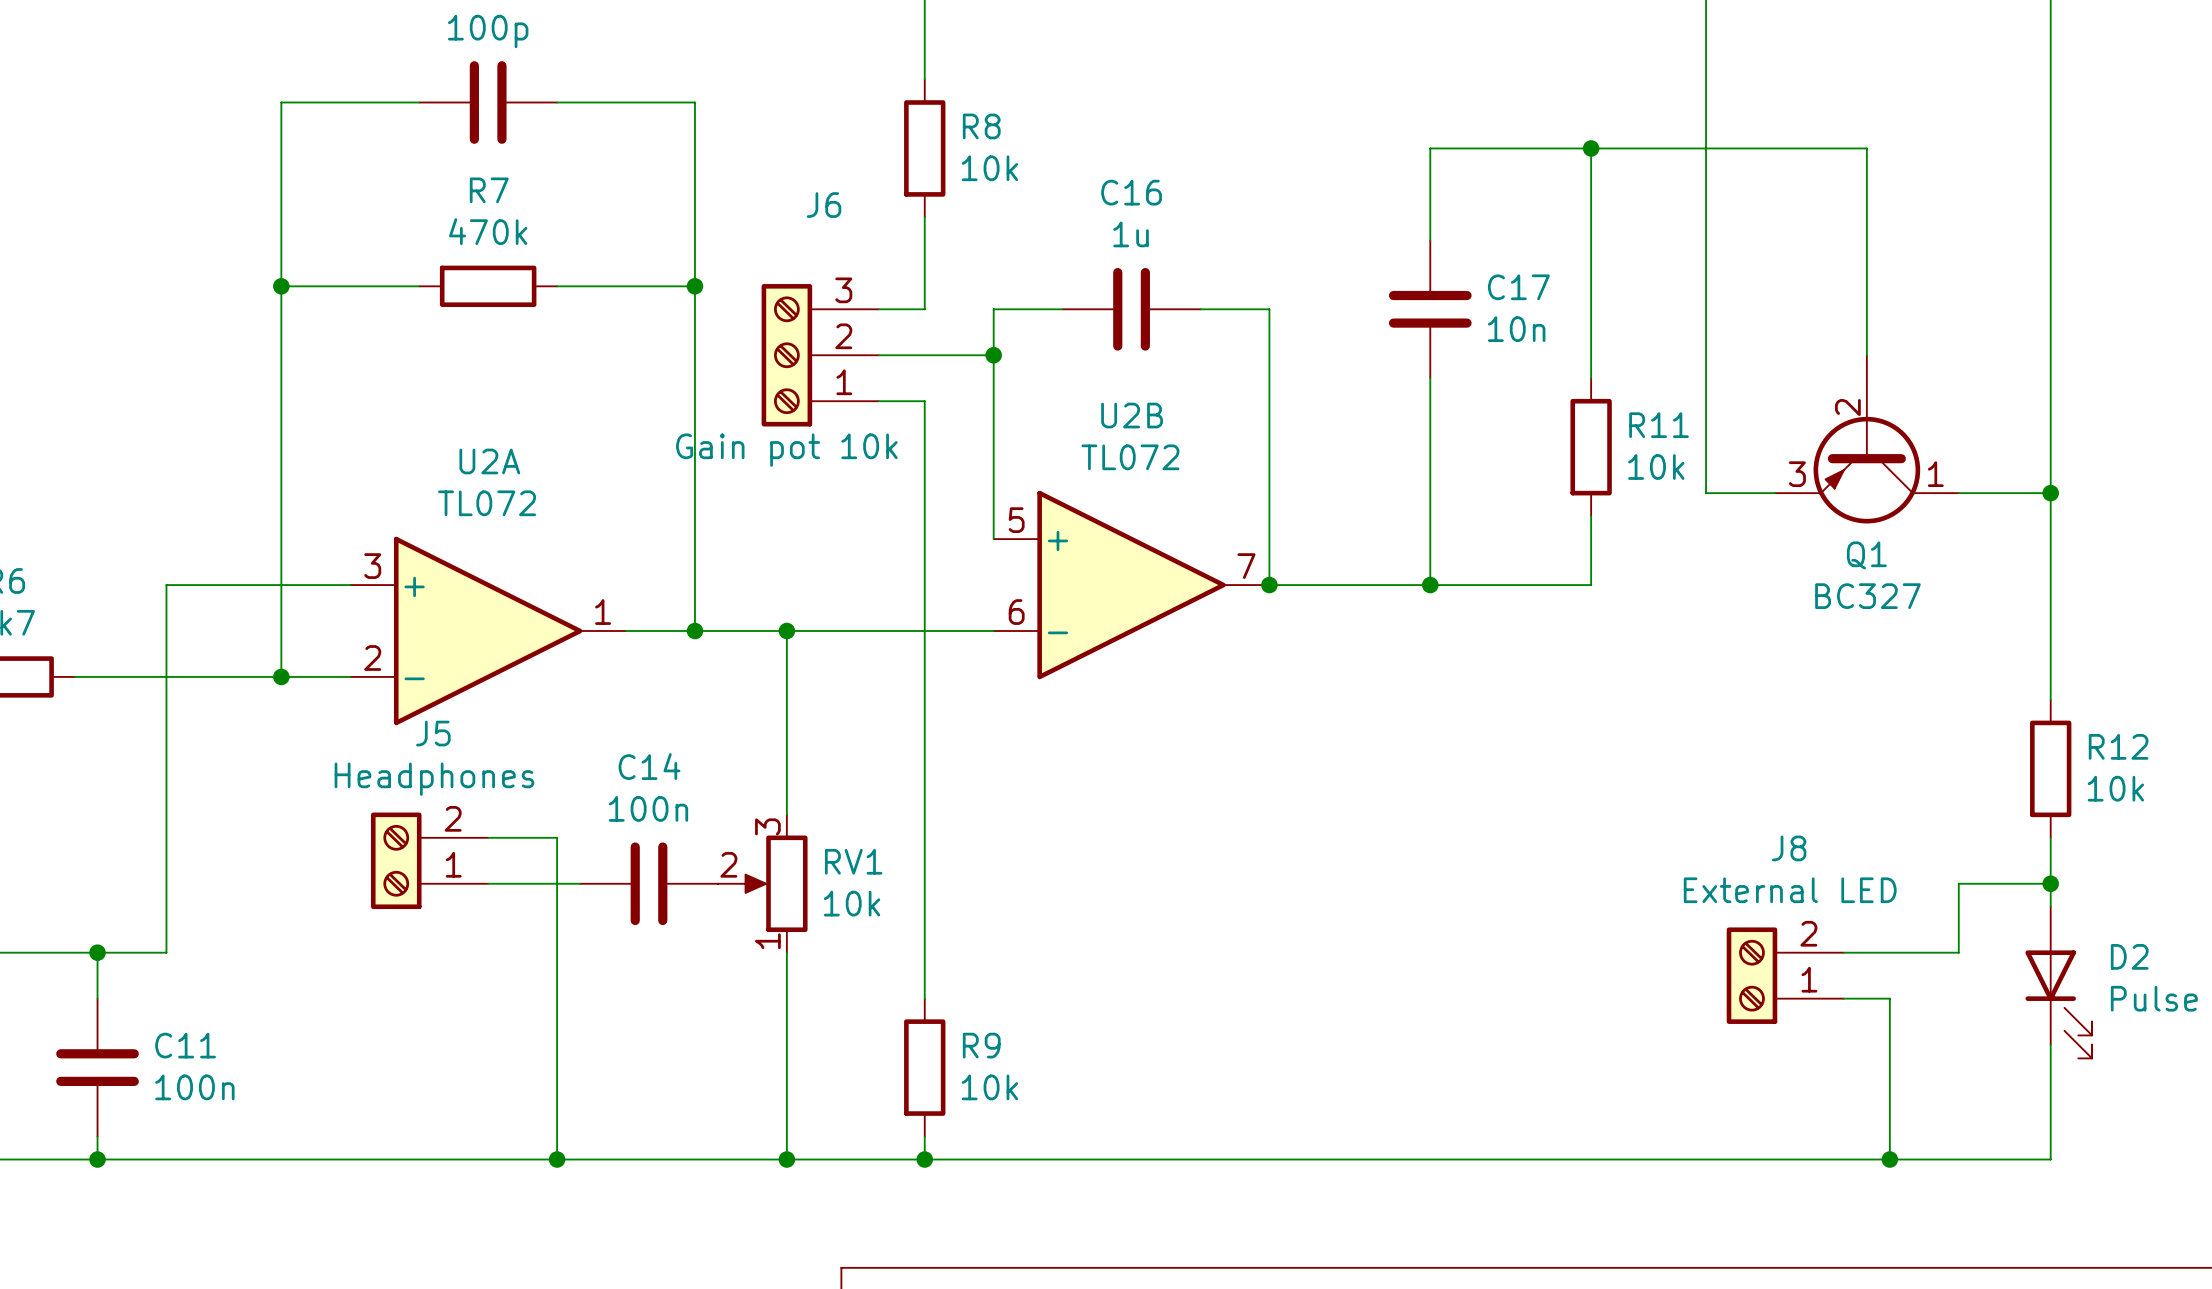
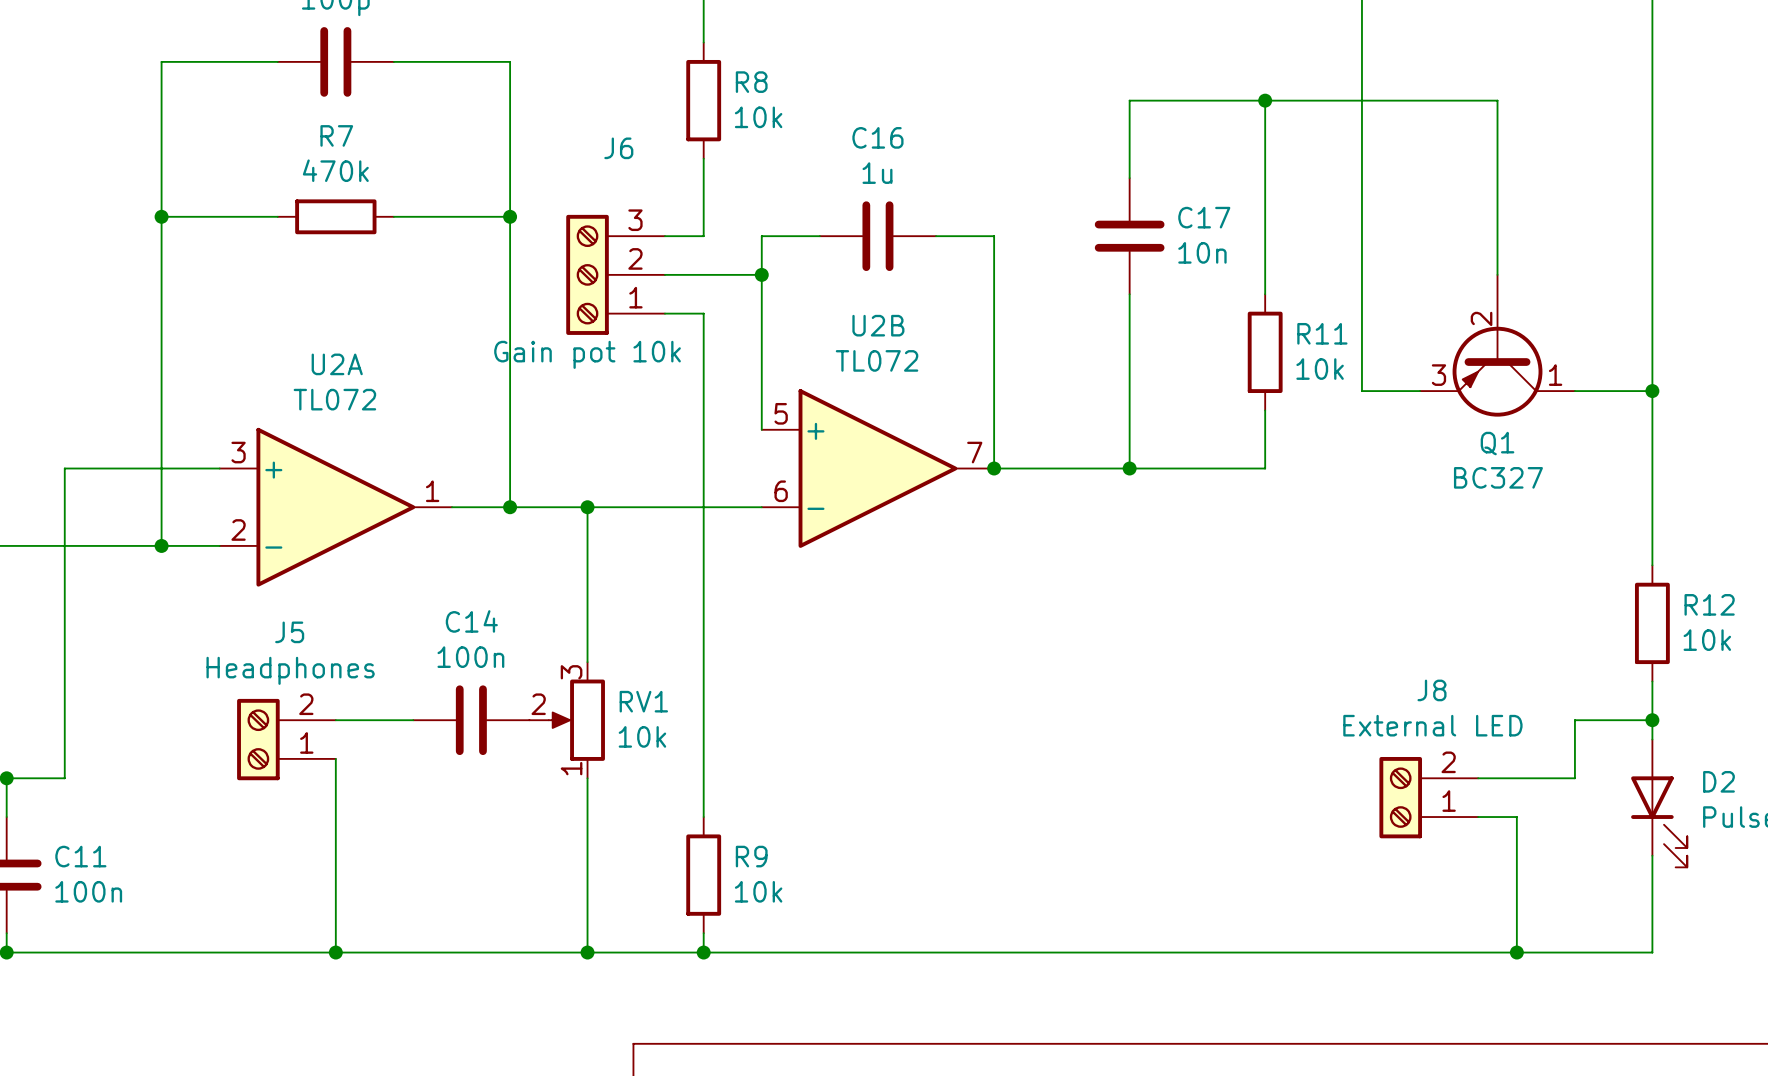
wire: (488, 837) (557, 837) (557, 1159) -> none
J5 position: (429, 860) -> (286, 739)
wire: none -> (335, 758) (335, 952)
junction position: (557, 1159) -> (335, 952)

